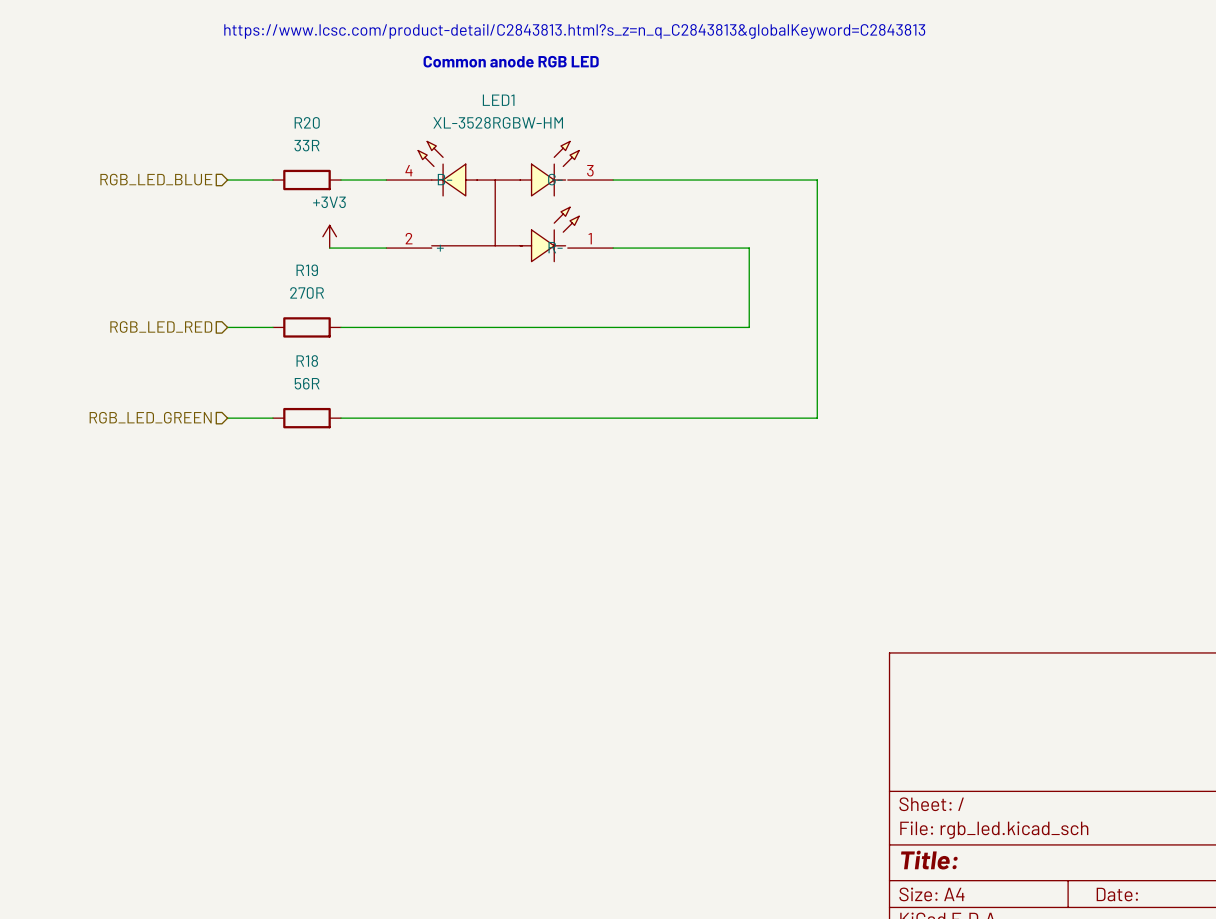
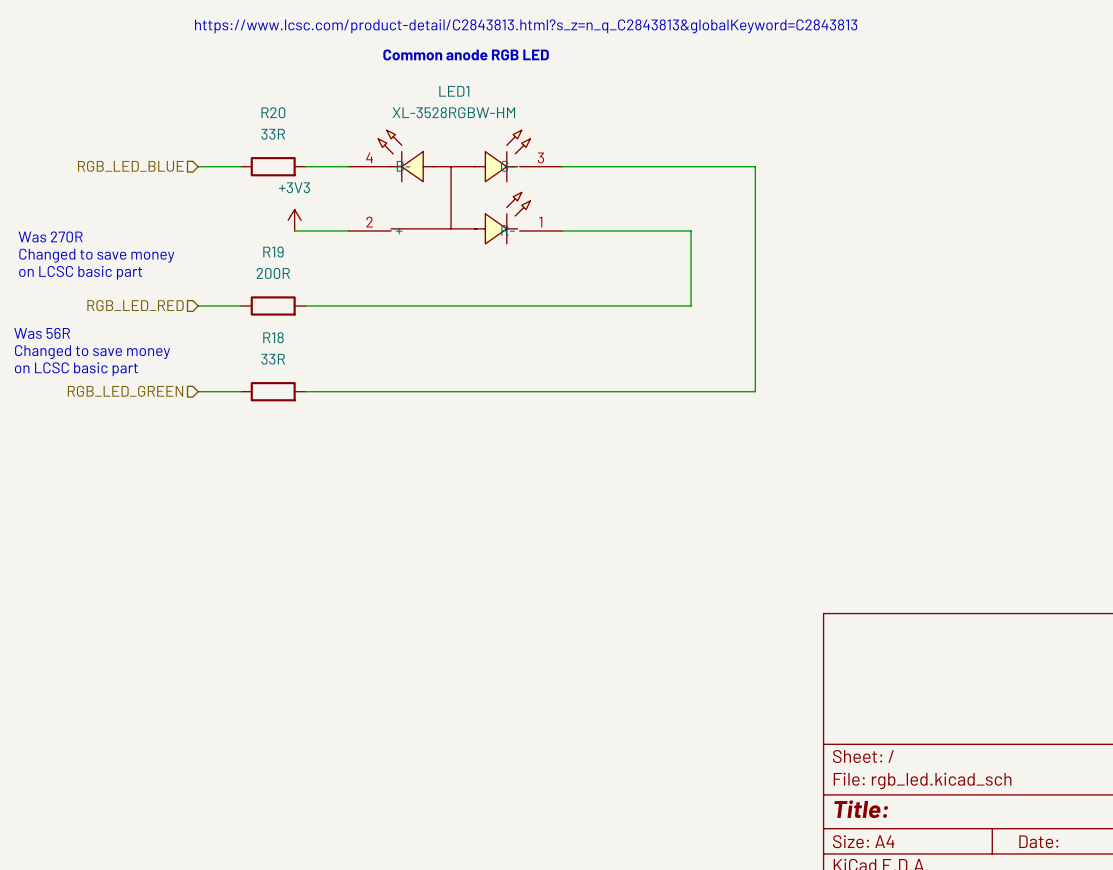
text: none -> Was 270R (50, 236)
text: none -> Changed to save money (96, 255)
text: none -> on LCSC basic part (80, 272)
R19 value: 270R (307, 292) -> 200R (273, 273)
text: none -> Was 56R (42, 333)
text: none -> Changed to save money (92, 352)
R18 value: 56R (307, 383) -> 33R (273, 359)
text: none -> on LCSC basic part (76, 369)

